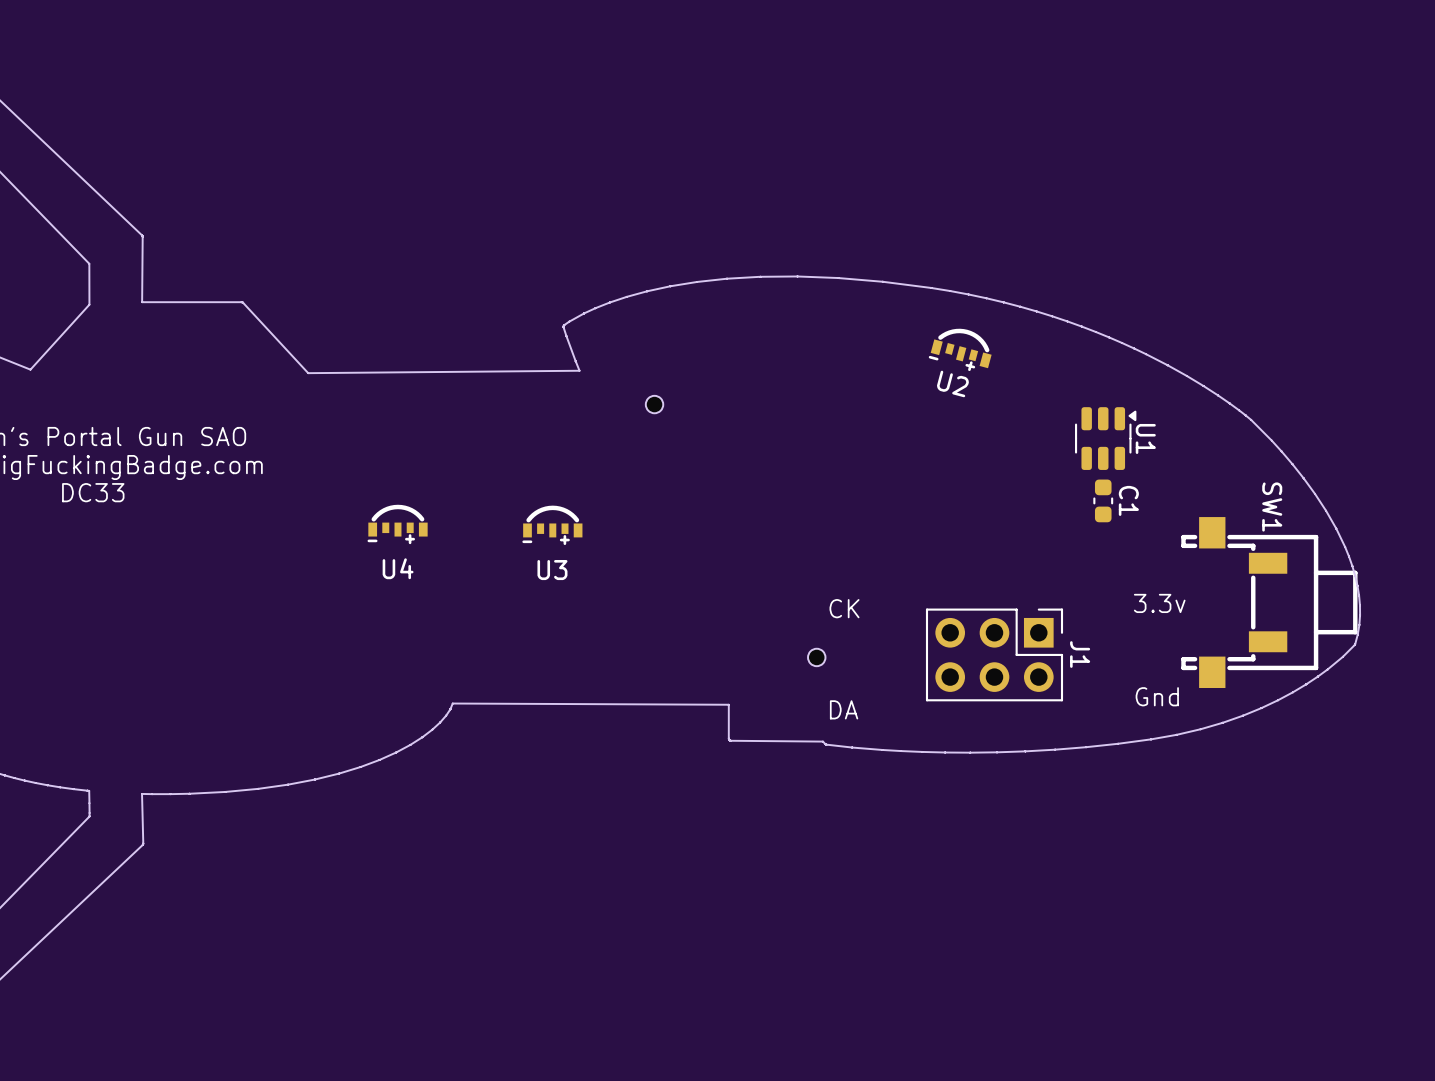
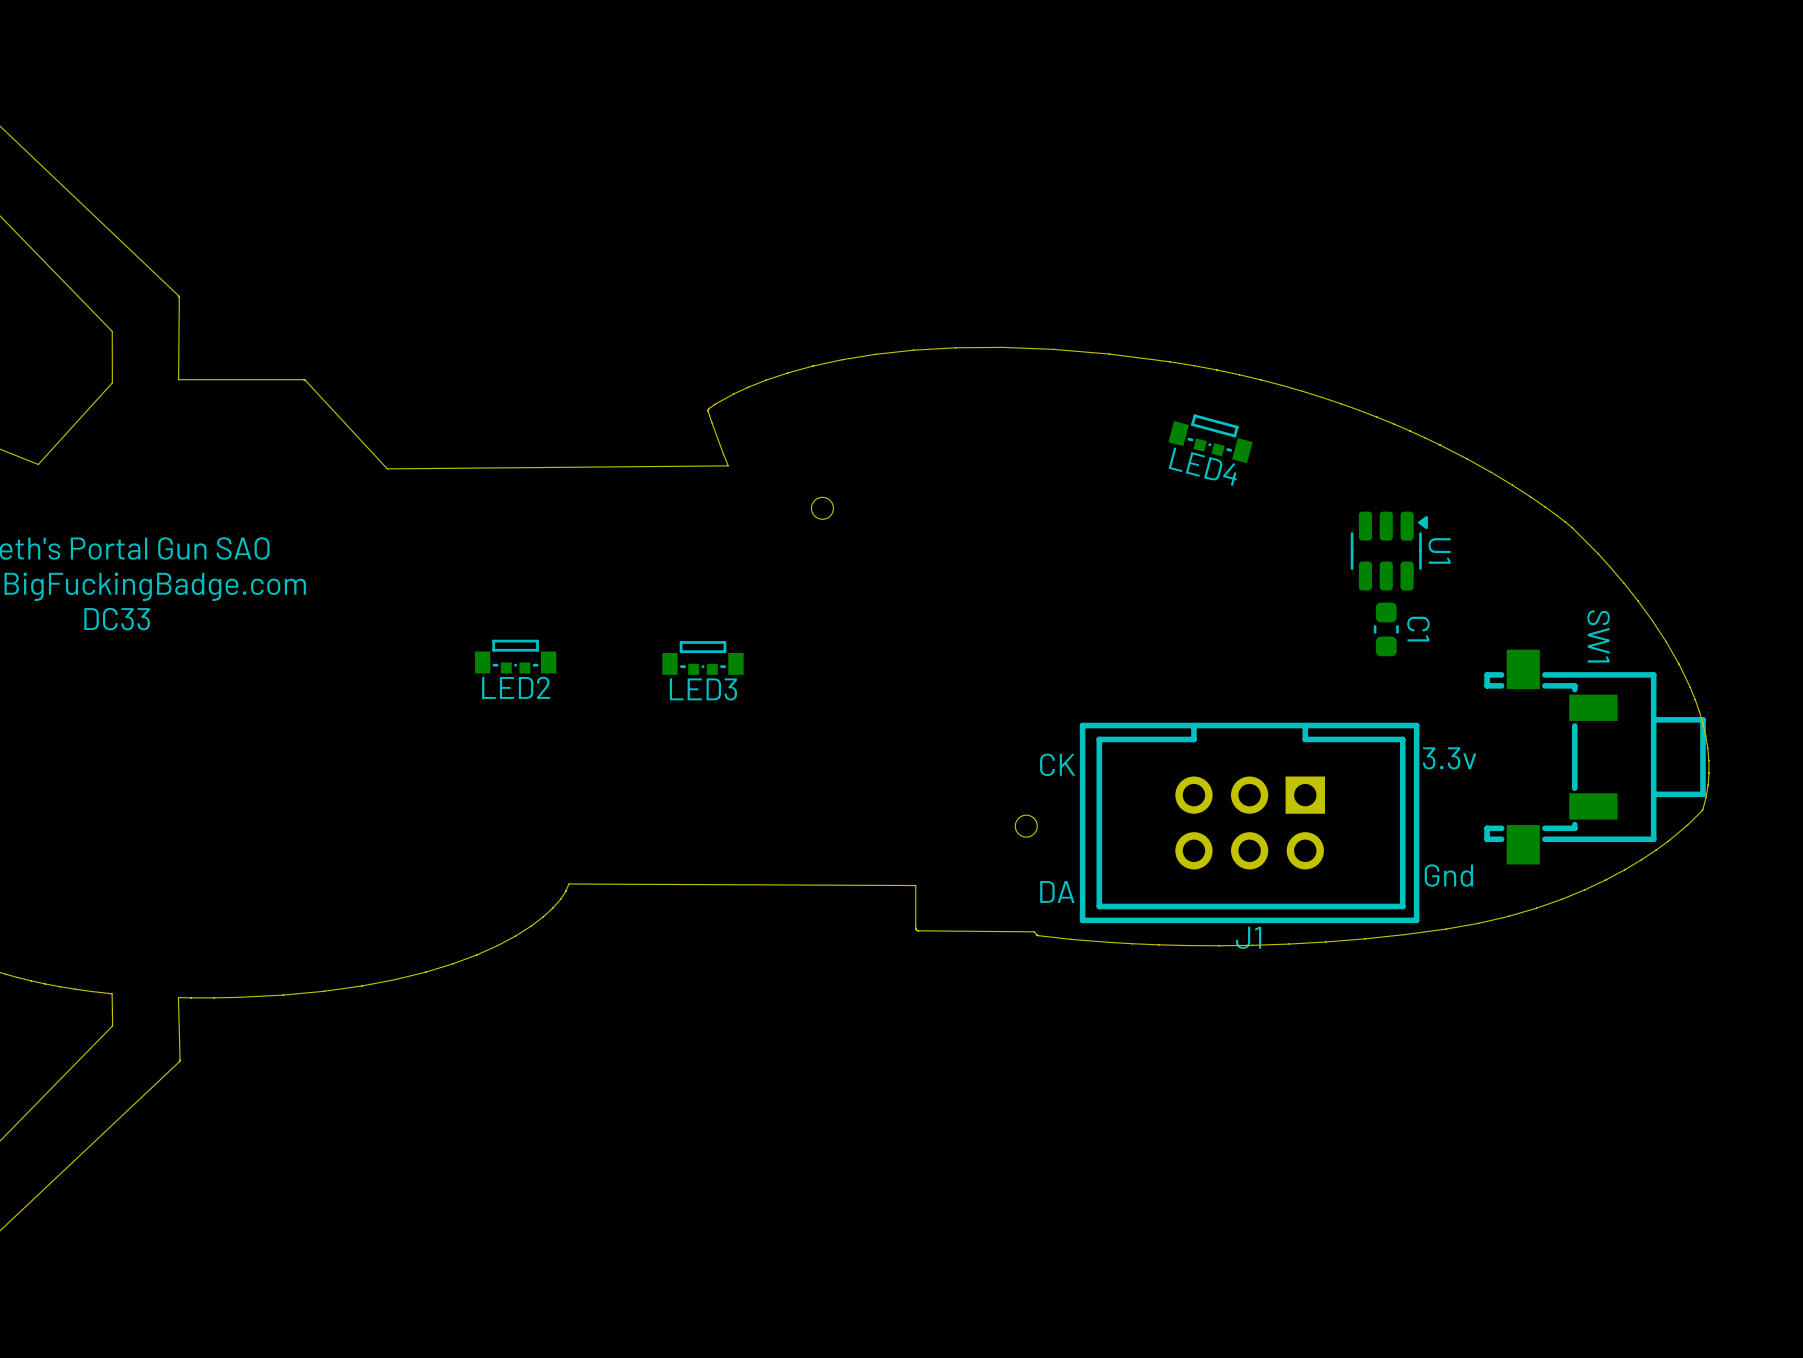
U2: (960, 349) -> none
LED4: none -> (1210, 438)
LED2: none -> (515, 656)
LED3: none -> (702, 657)
U4: (397, 524) -> none
U3: (552, 525) -> none
J1 footprint: [925, 608, 1064, 702] -> [1079, 722, 1420, 924]
J1 name position: J1 (1080, 654) -> J1 (1248, 937)

